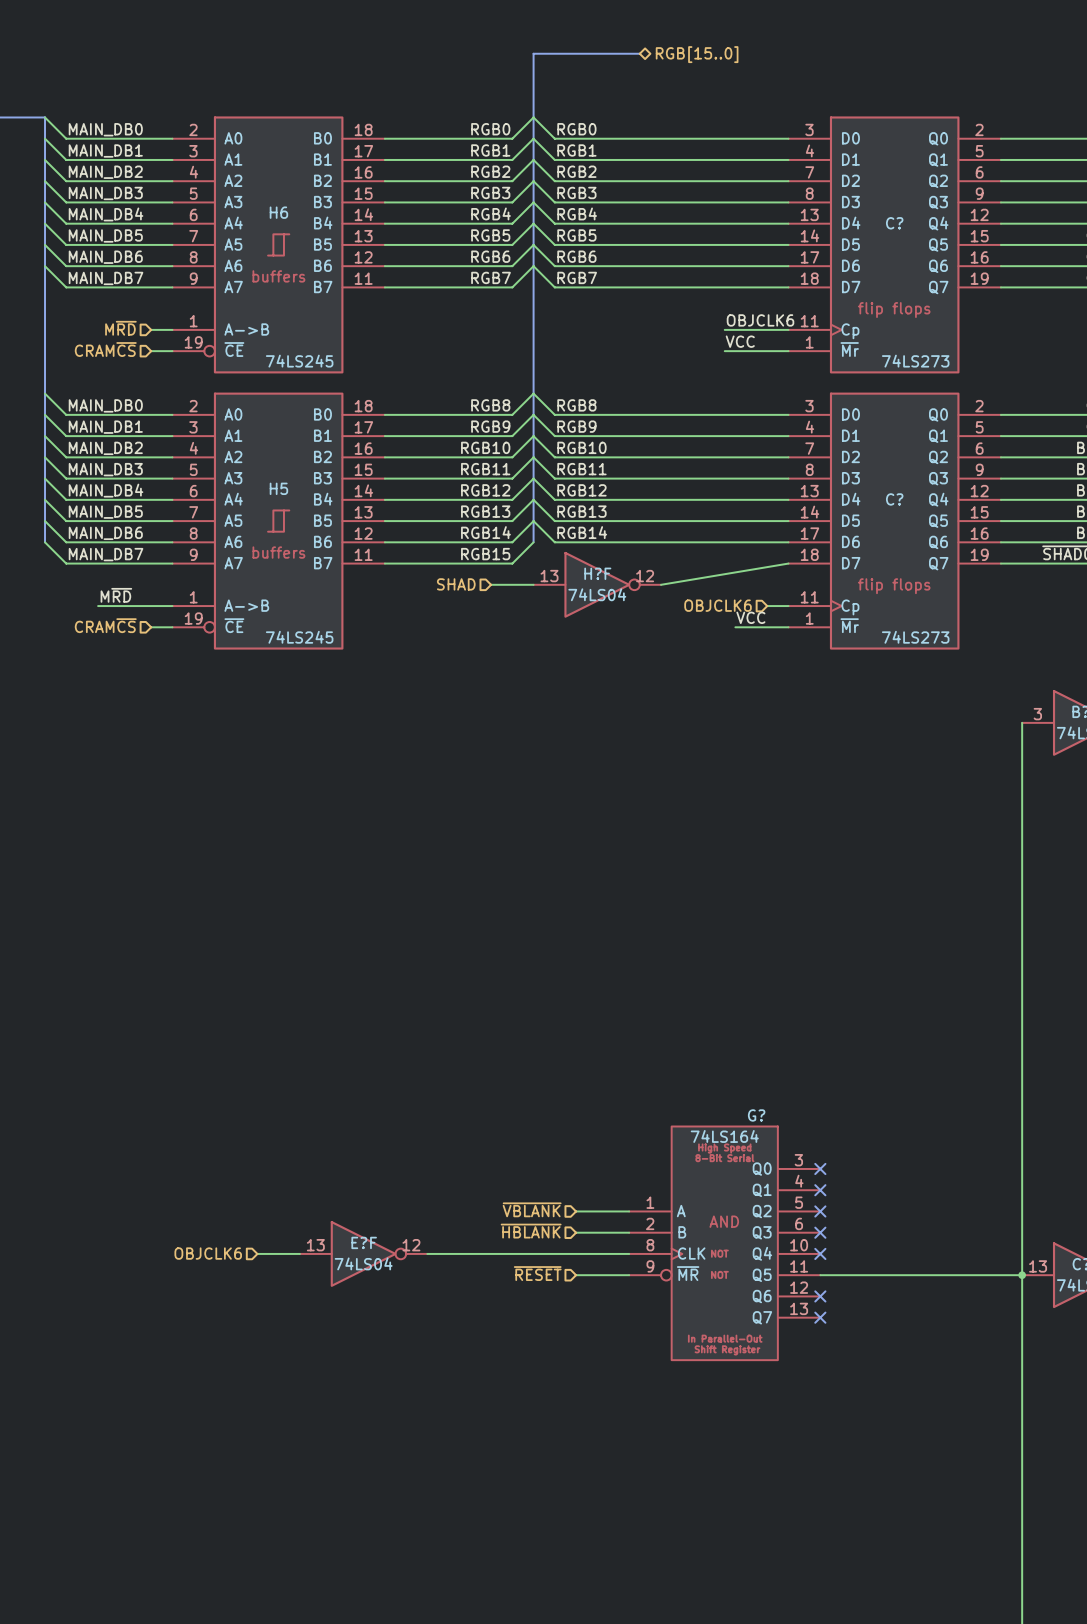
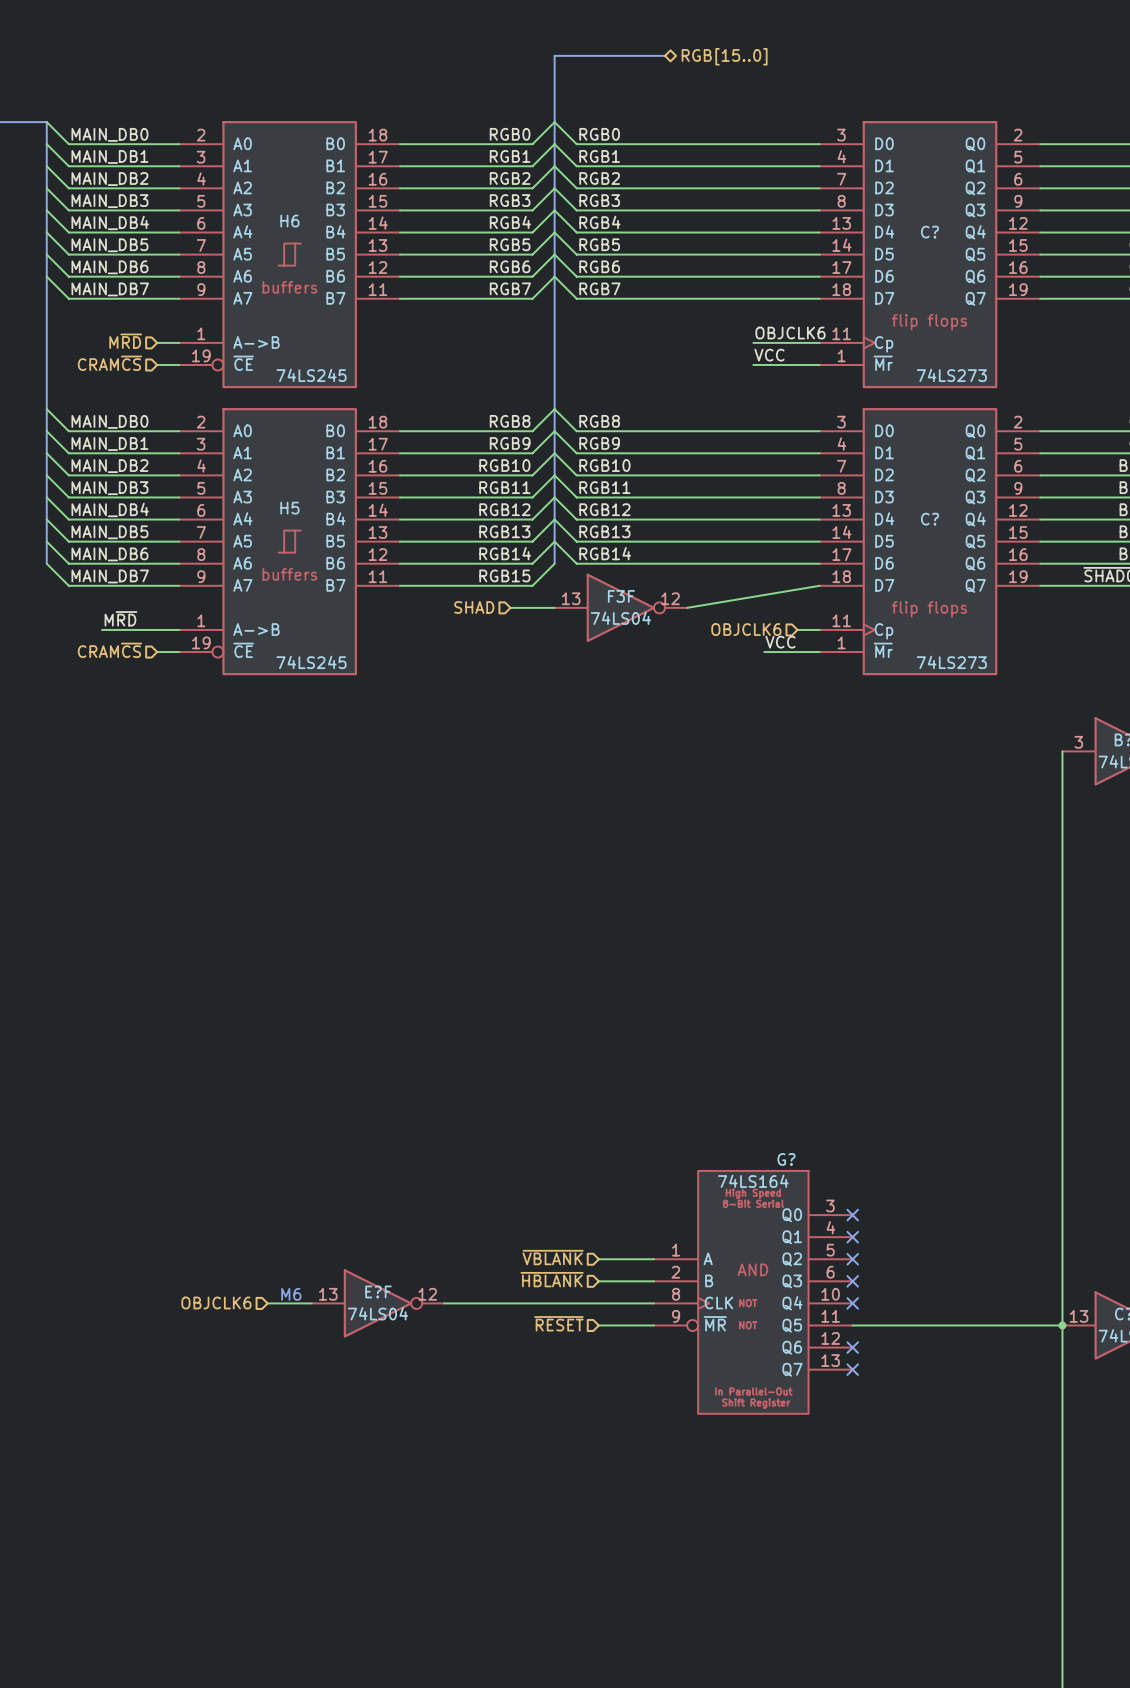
H?F name: H?F (597, 573) -> F3F (621, 596)
text: none -> M6 (291, 1294)

